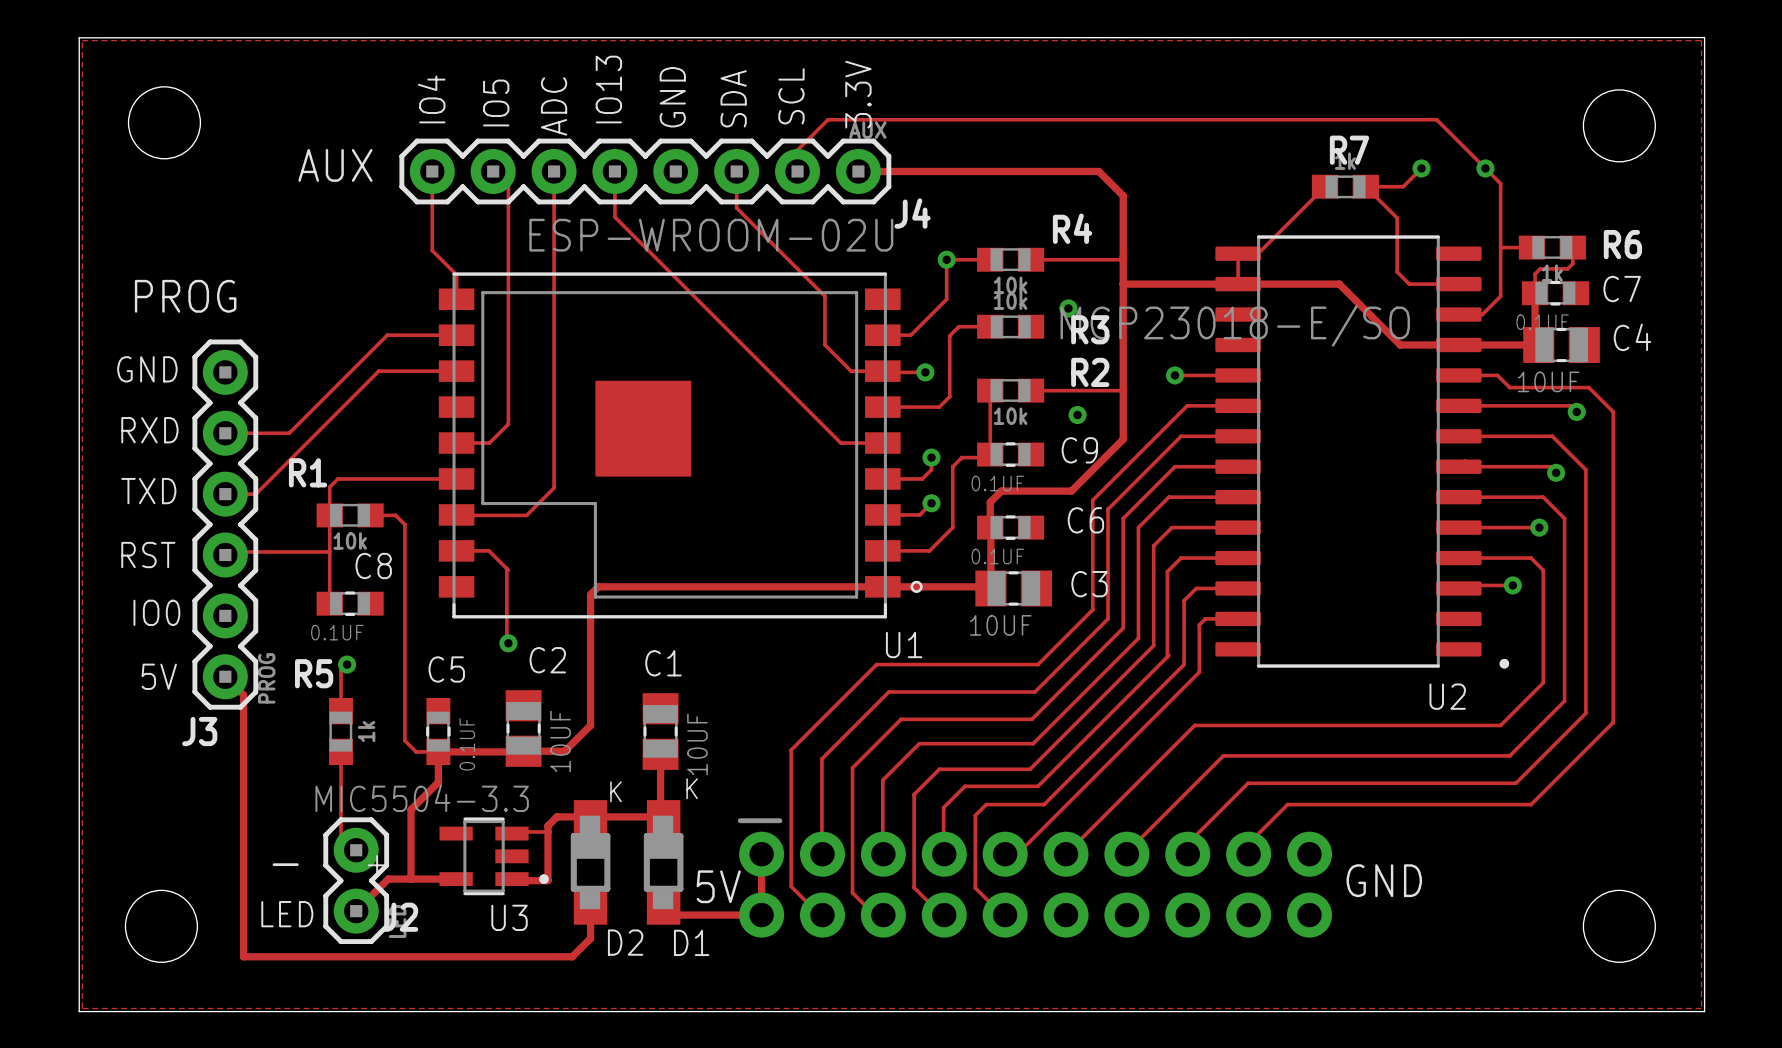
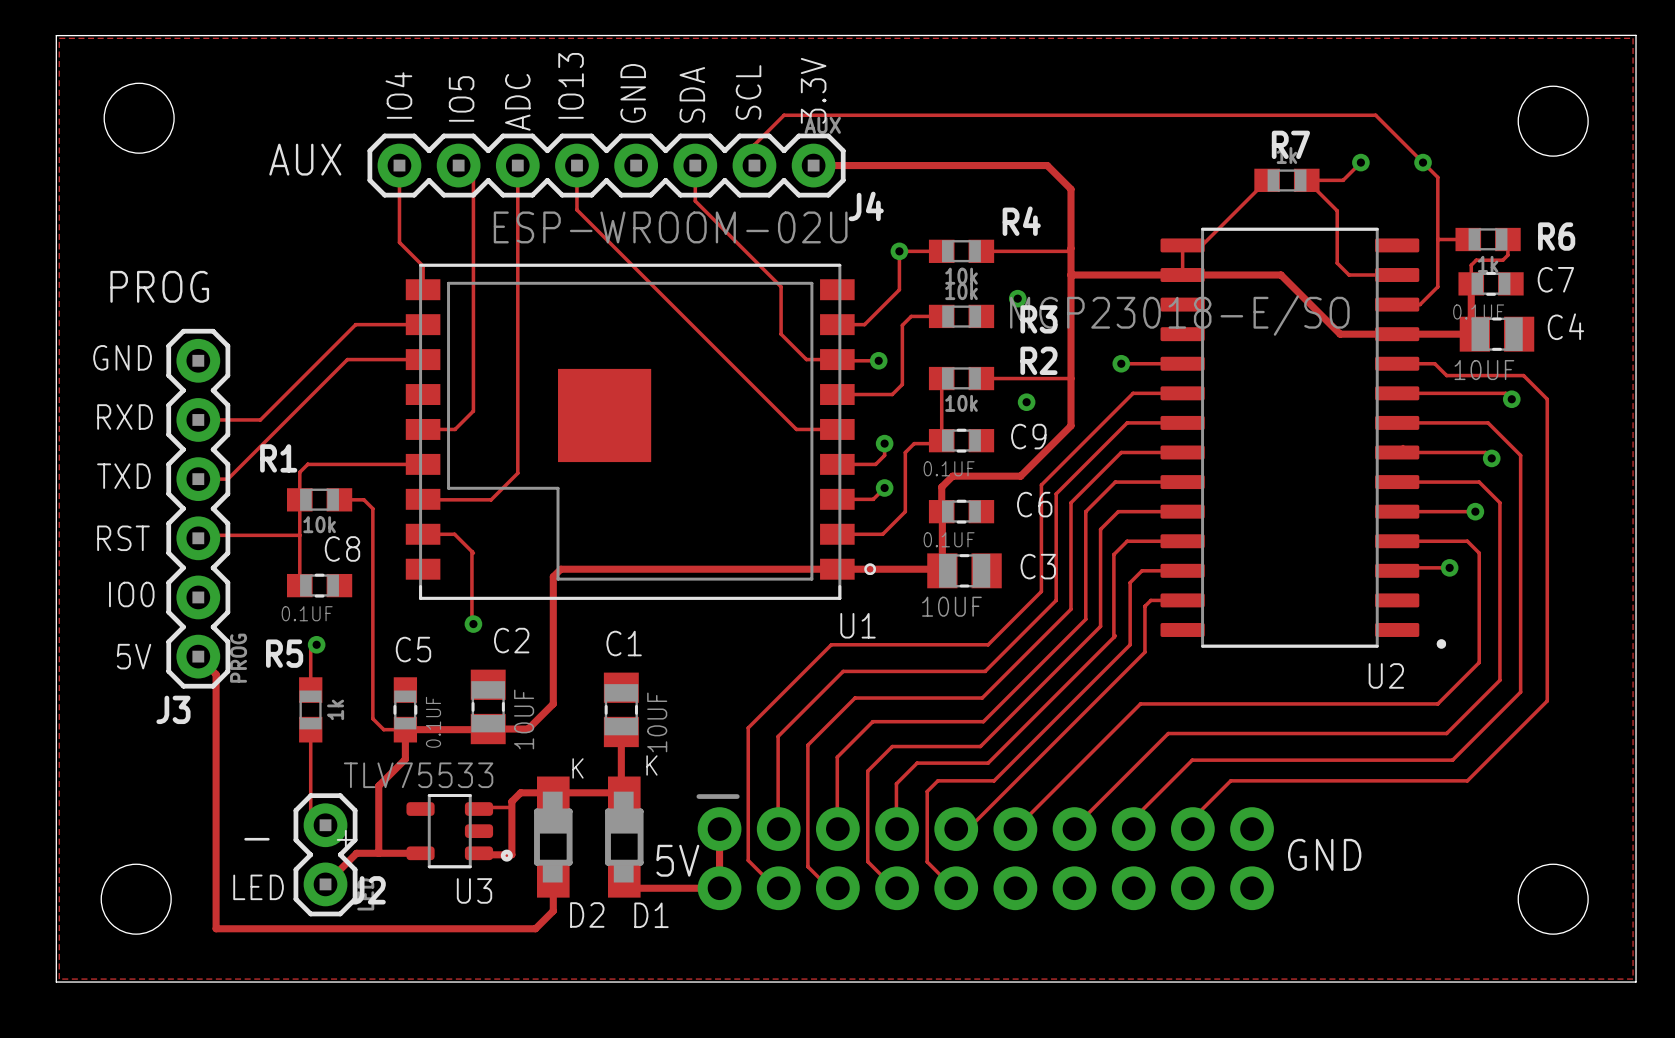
U3 value: MIC5504-3.3 (422, 798) -> TLV75533 (418, 775)
U3 footprint: [439, 817, 549, 896] -> [406, 794, 513, 869]

